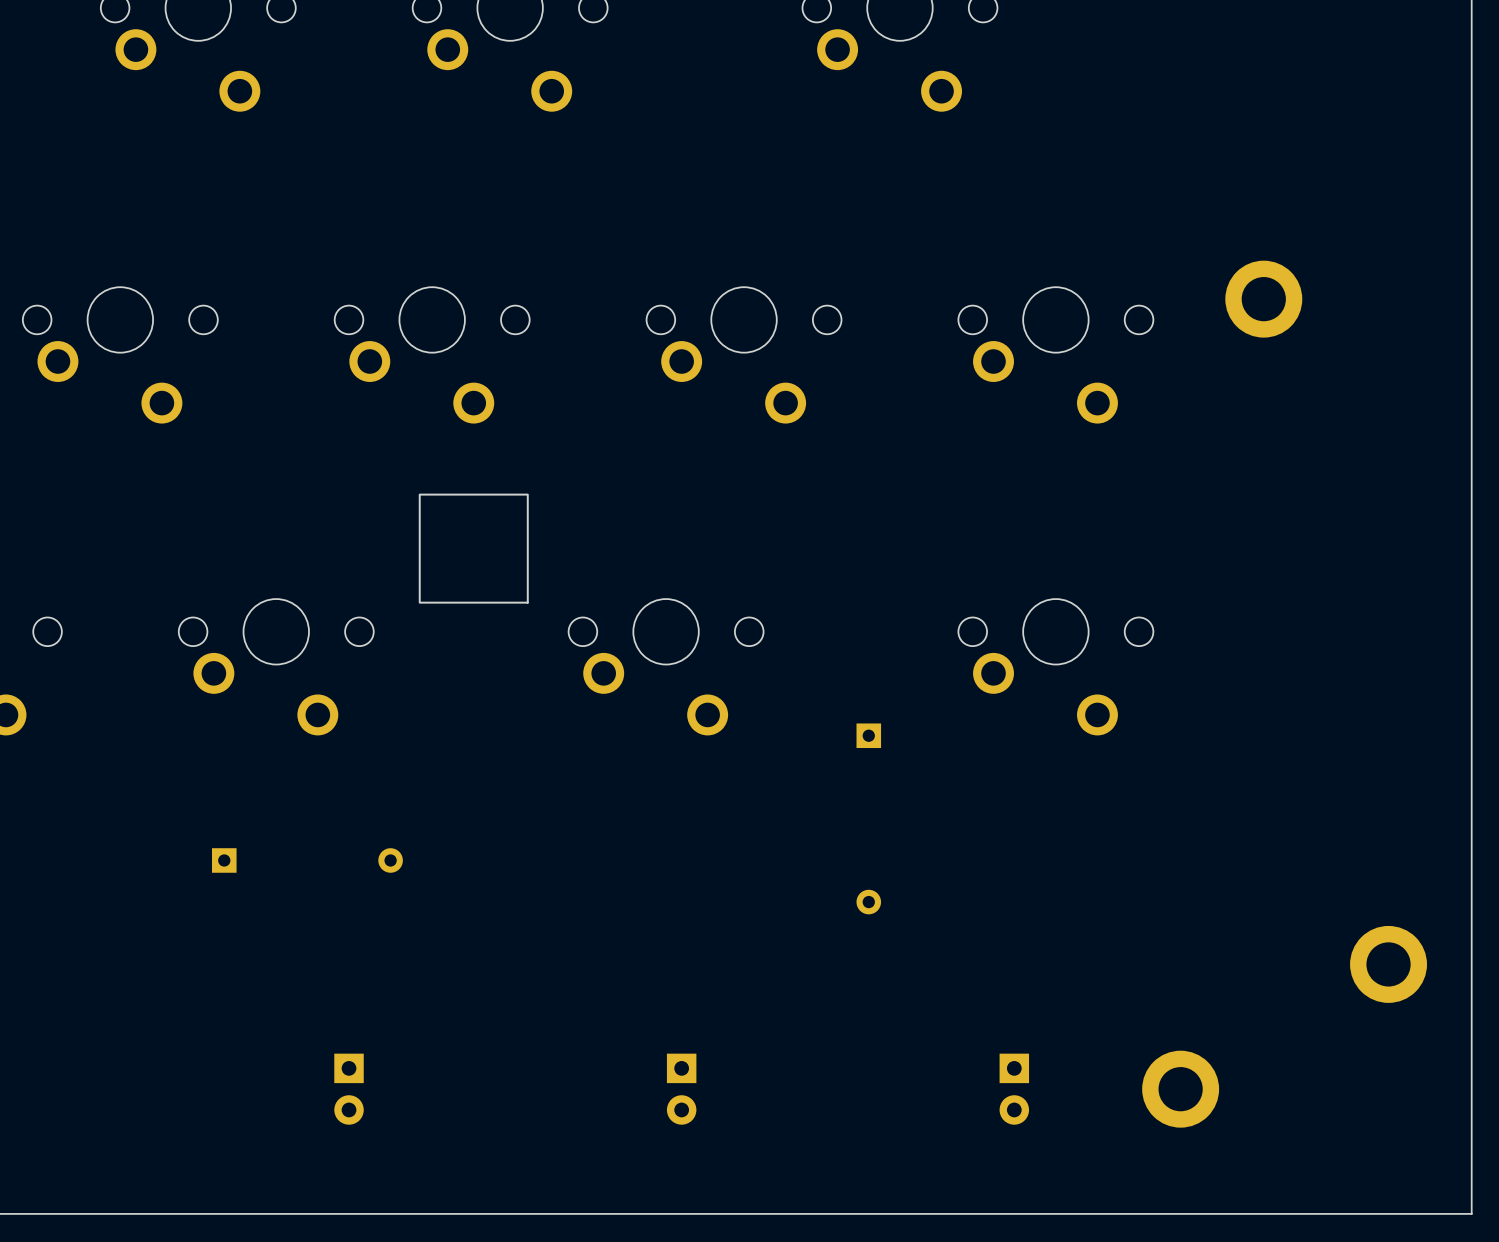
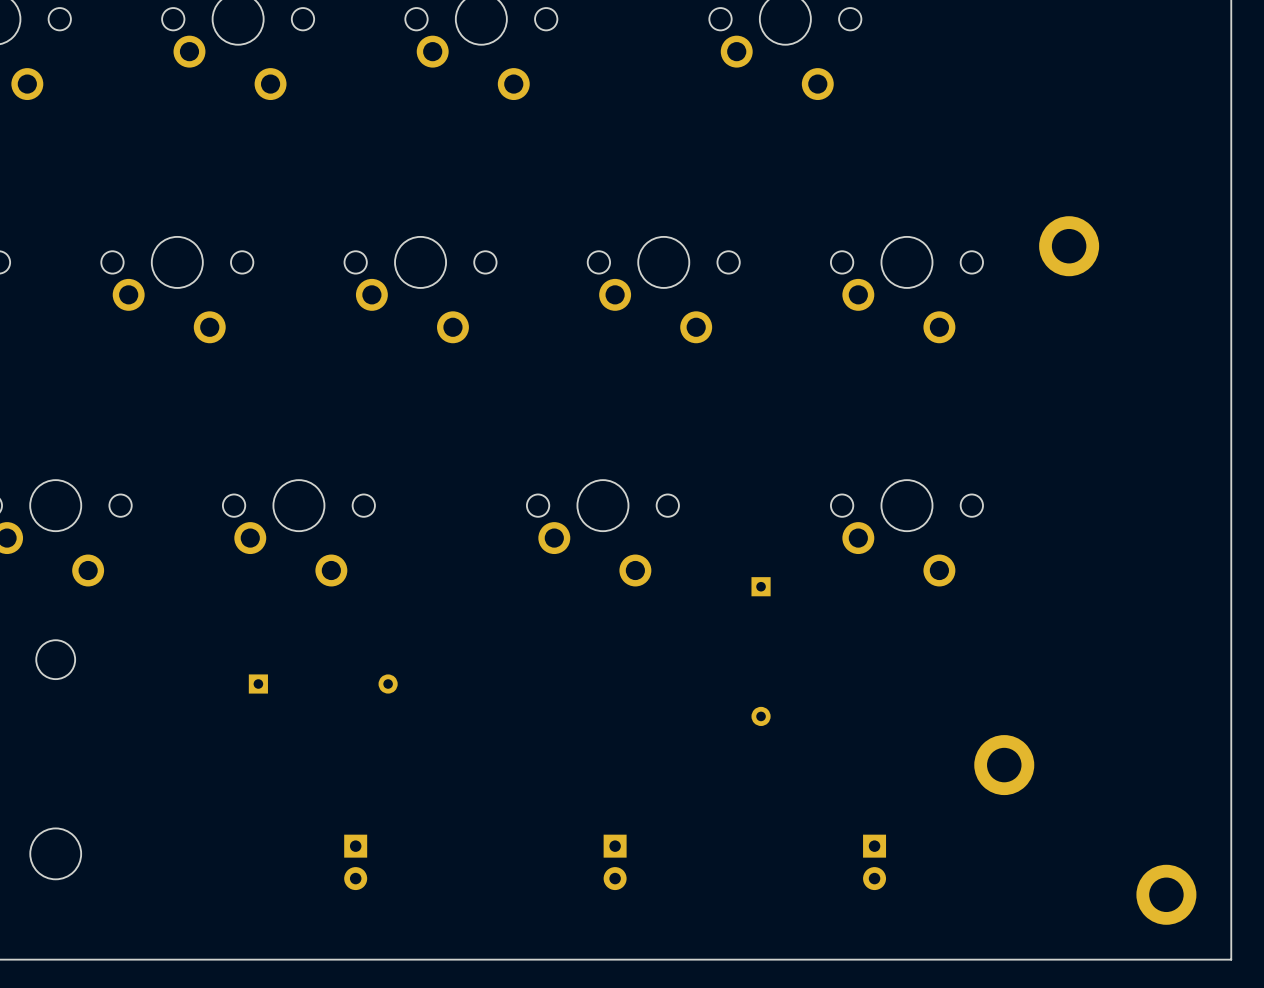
drawing: [418, 493, 529, 604] -> none
part: none -> (1004, 765)
part: (1388, 964) -> none
part: (1180, 1089) -> none
part: none -> (1166, 894)

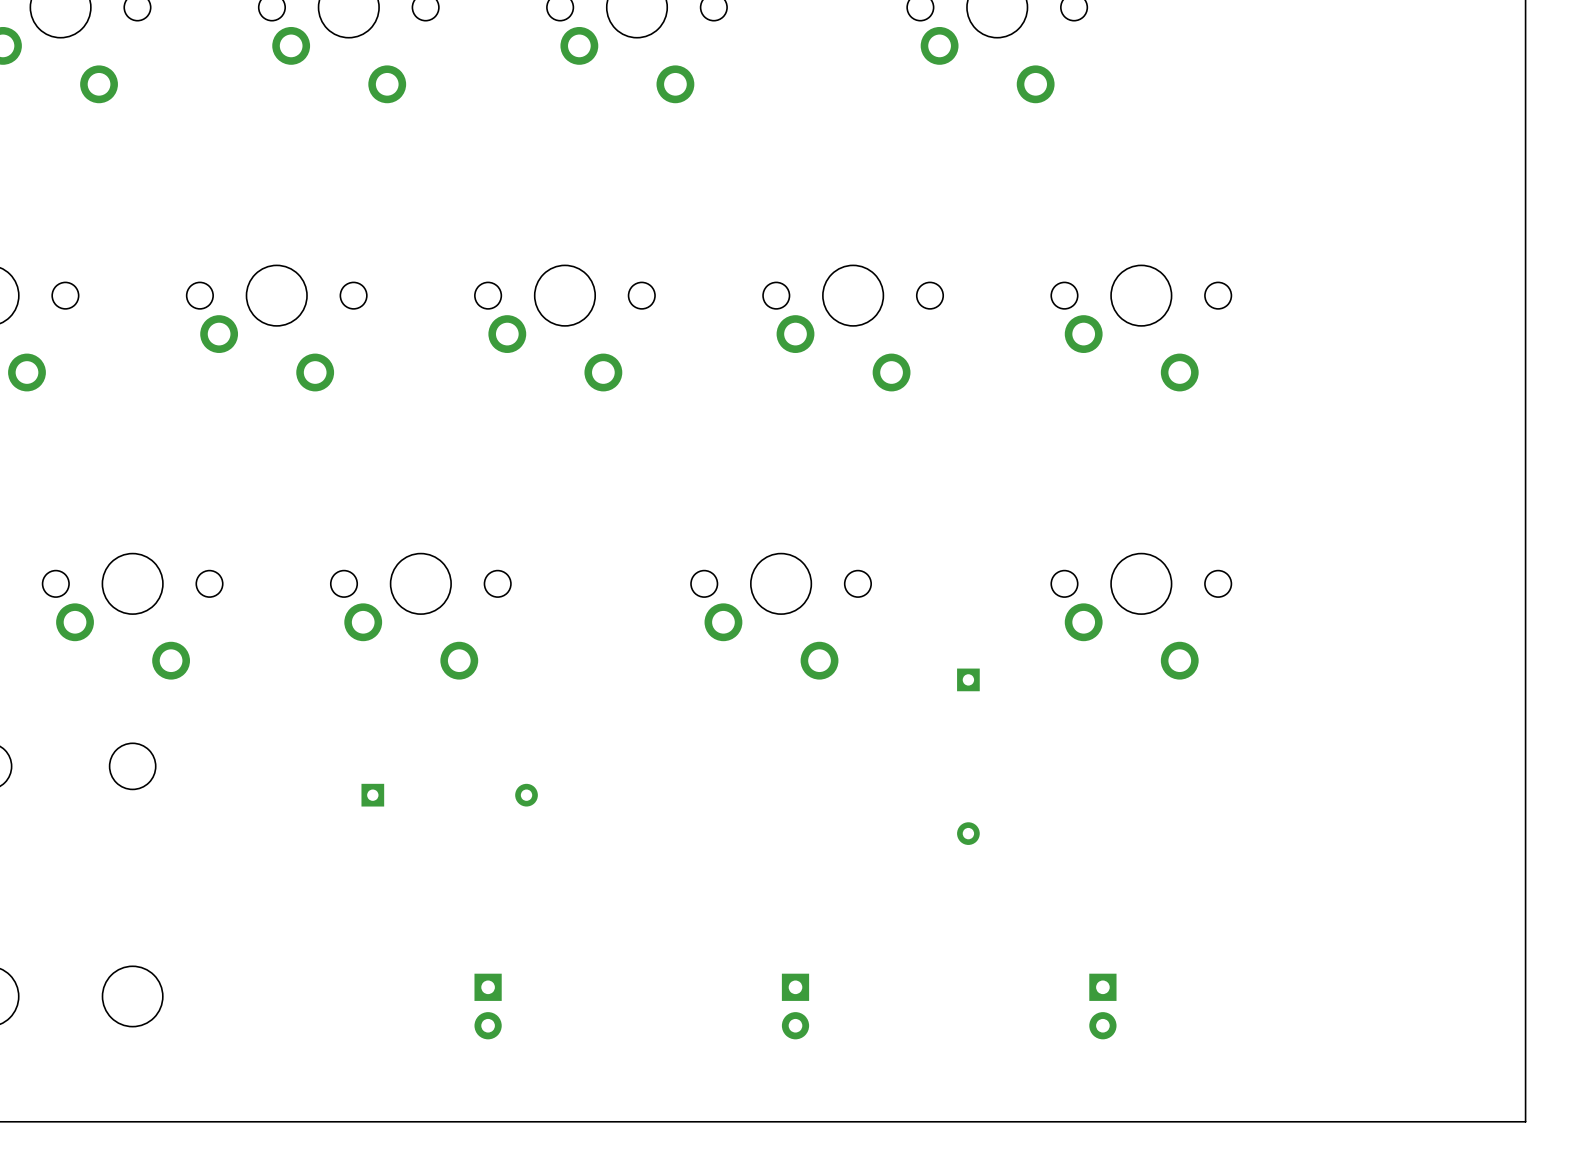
part: (1069, 246) -> none
part: (1004, 765) -> none
part: (1166, 894) -> none

